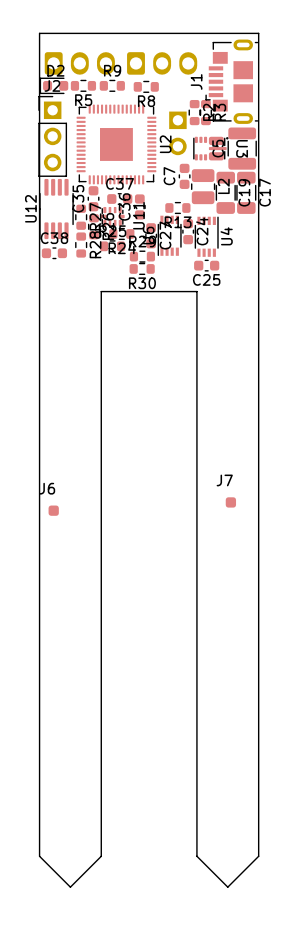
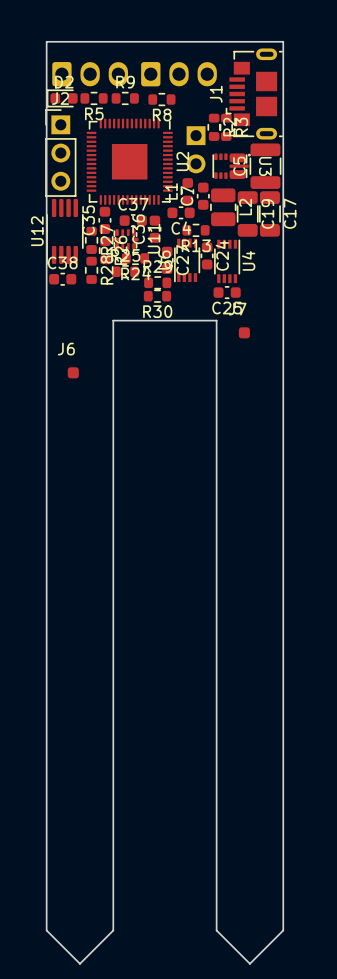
L1: none -> (187, 191)
C4: none -> (181, 212)
J7 position: (230, 502) -> (244, 332)
J6 position: (53, 510) -> (73, 372)

